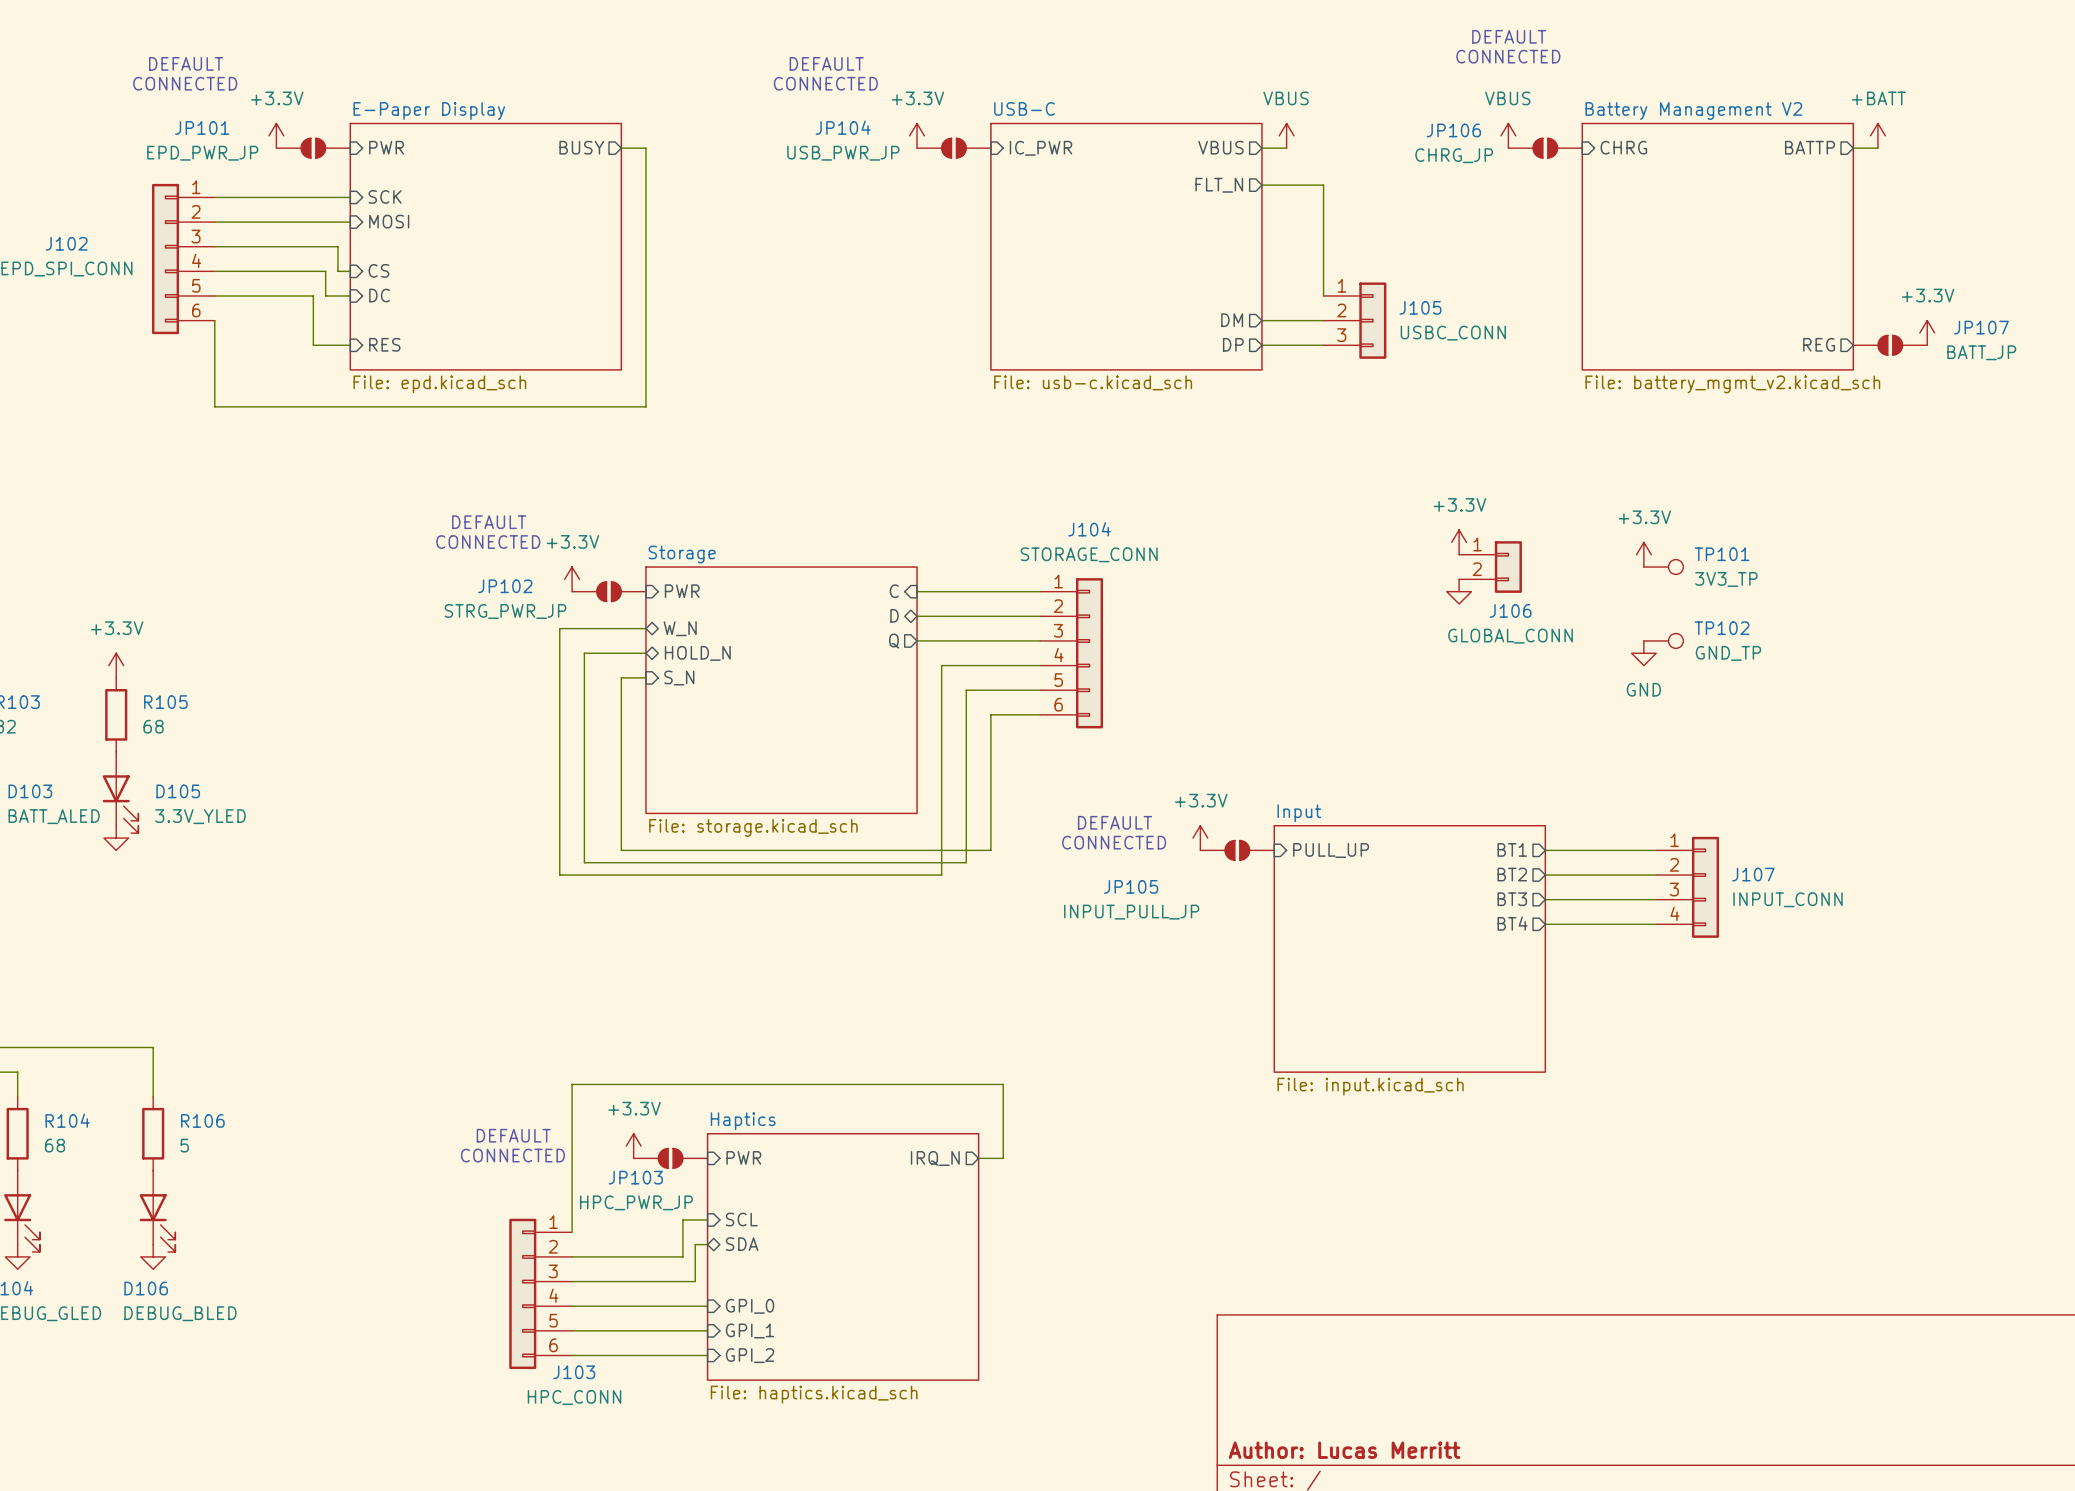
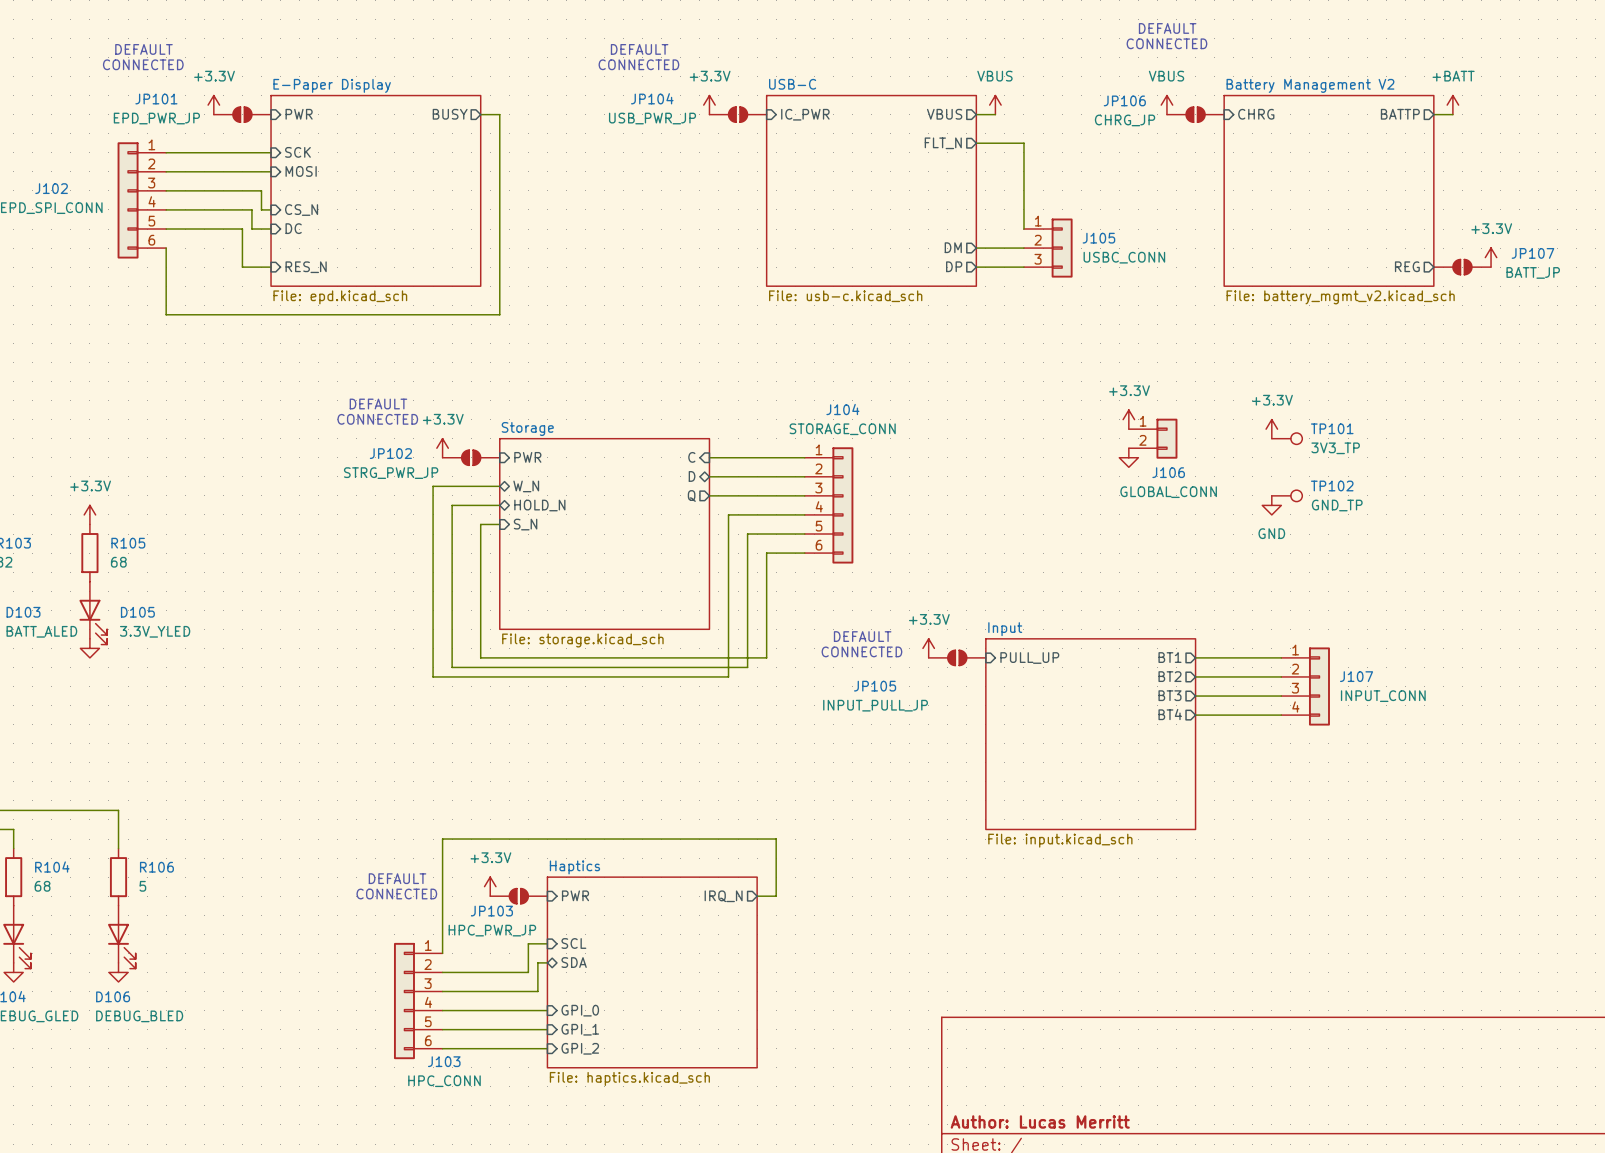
sheet pin: CS (378, 270) -> CS_N (301, 210)
sheet pin: RES (384, 344) -> RES_N (306, 267)

